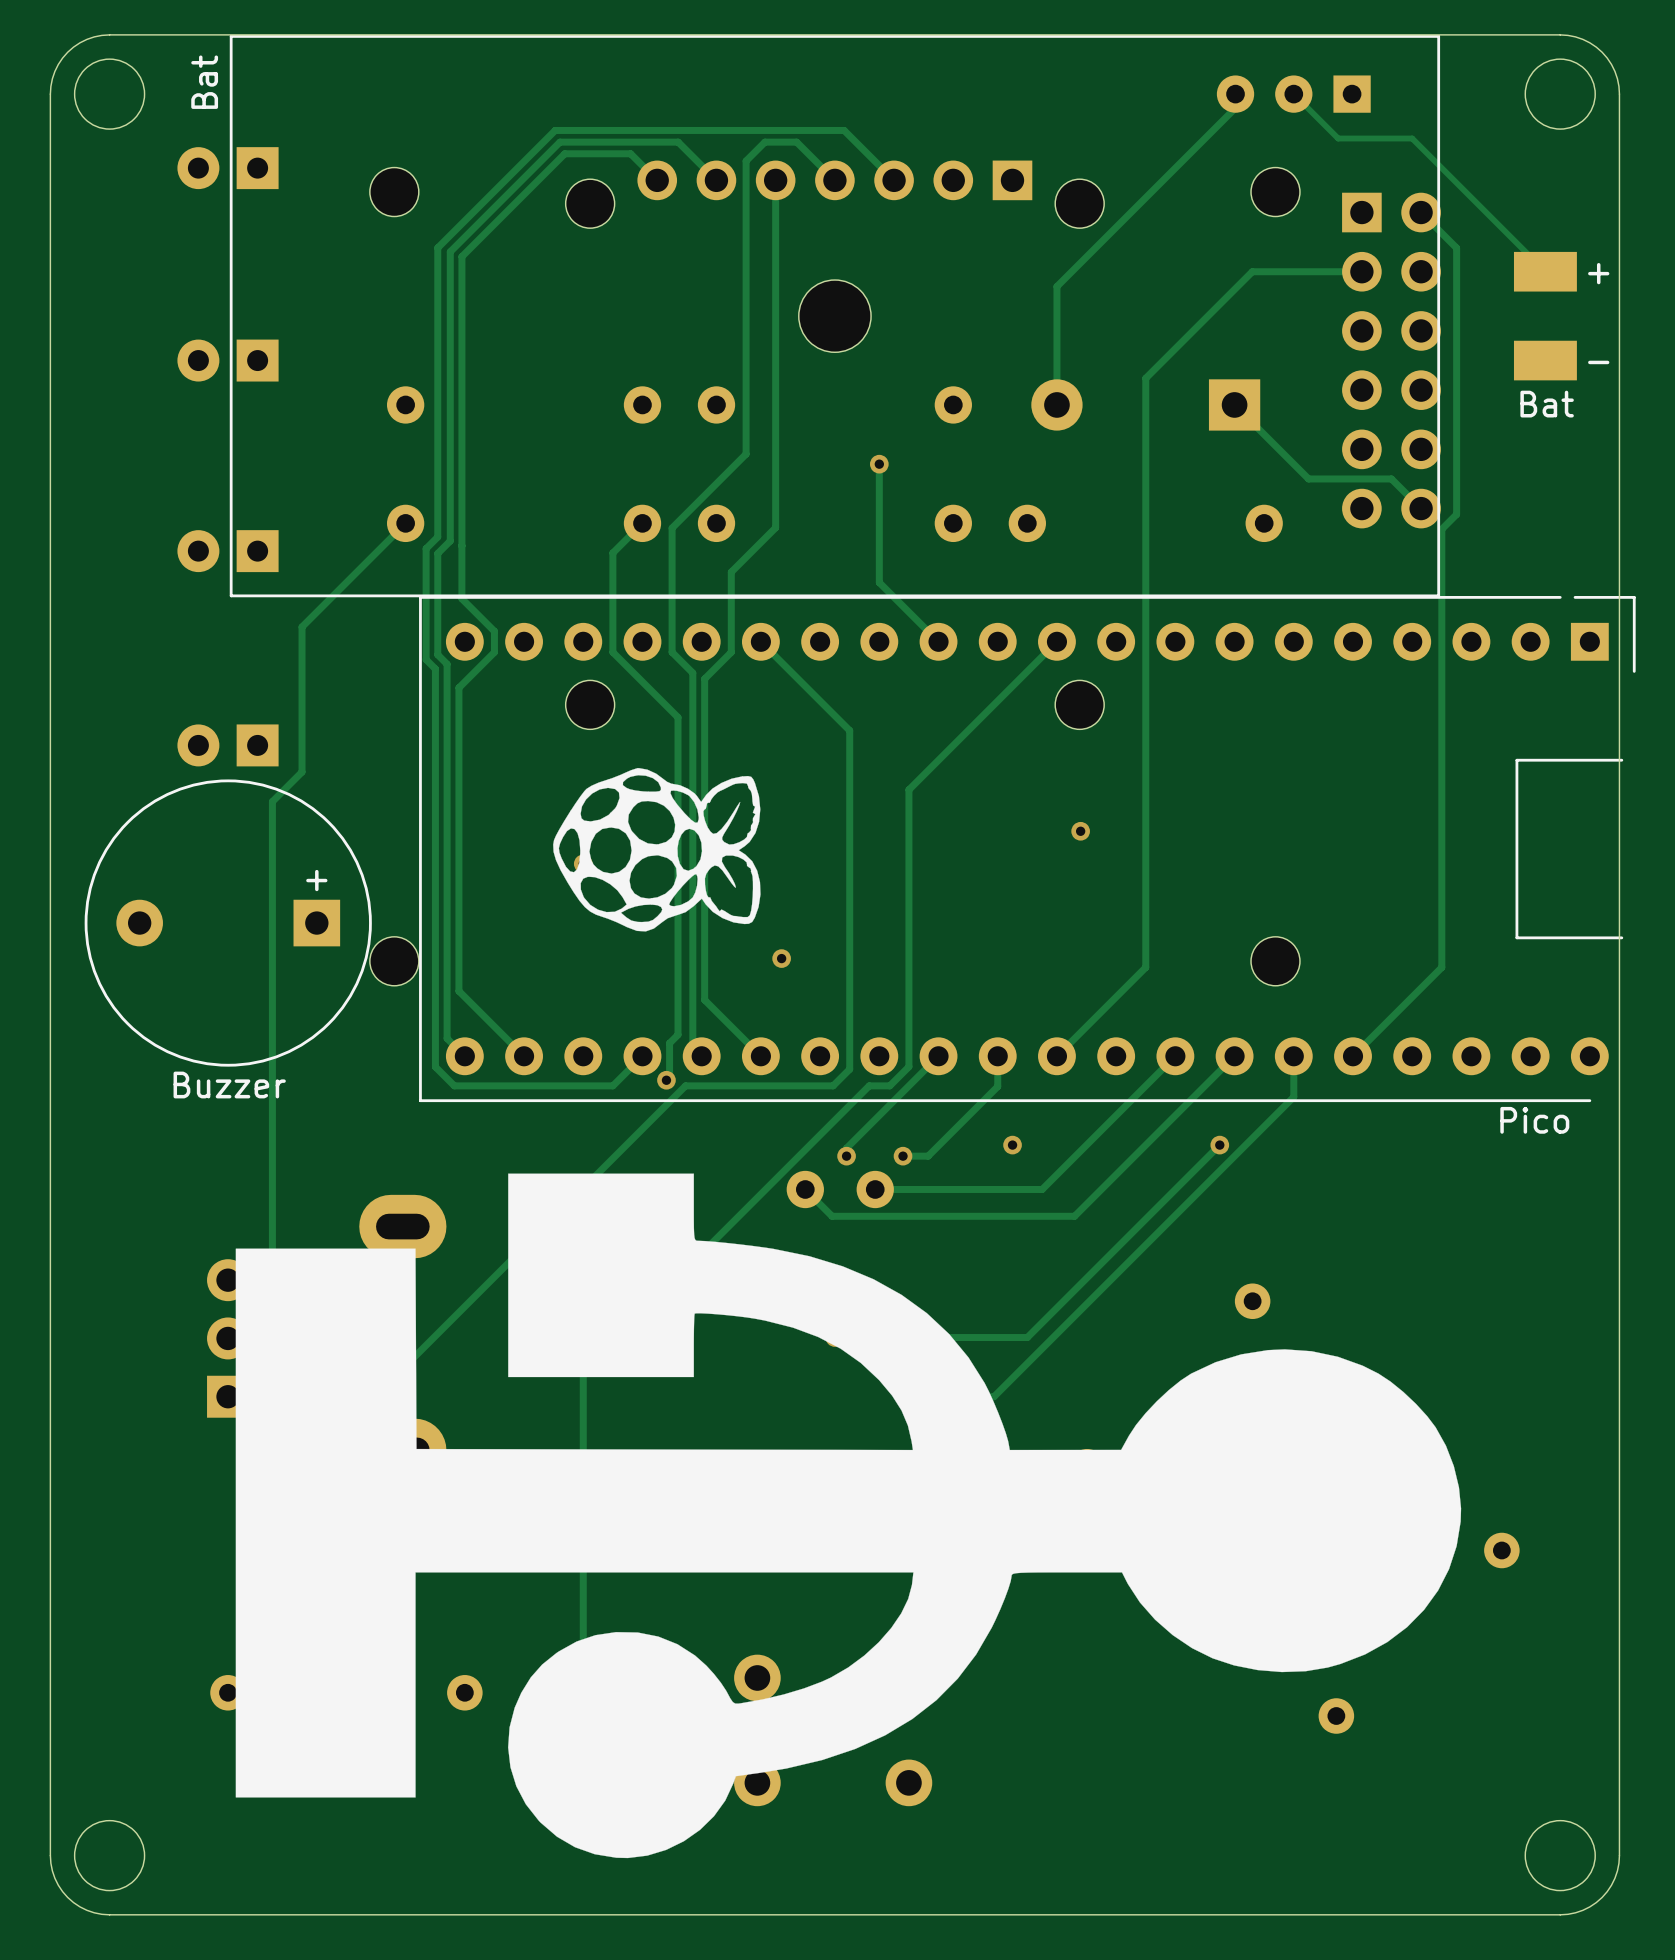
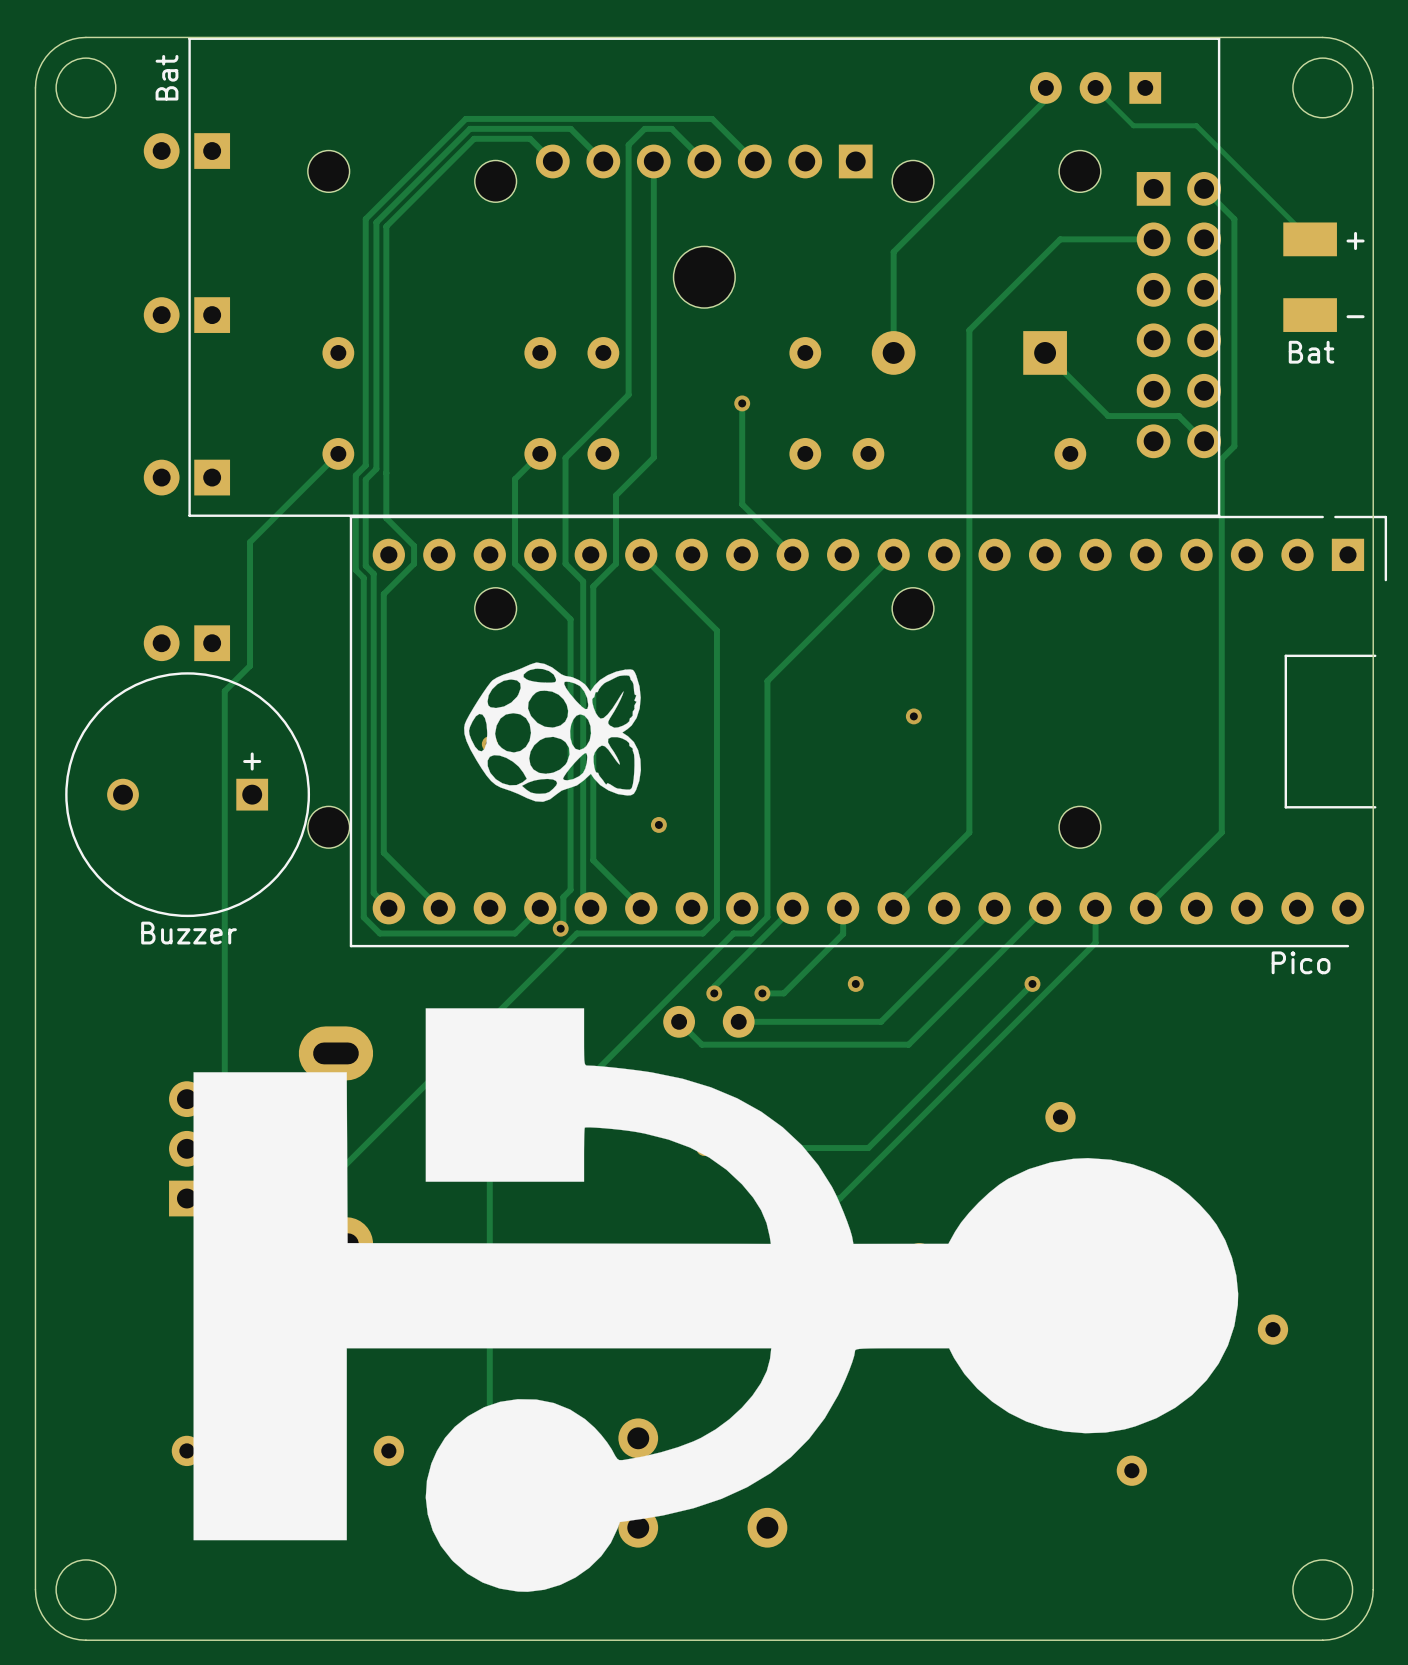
part footprint: [84, 779, 372, 1067] -> [65, 672, 311, 918]

